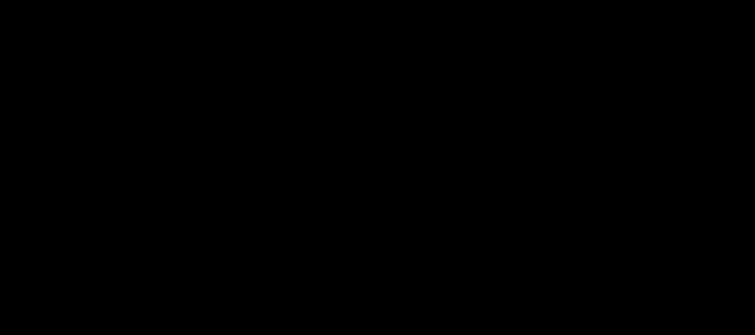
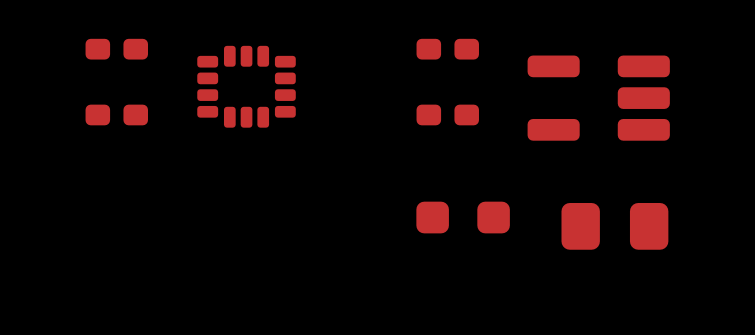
part: none -> (116, 49)
part: none -> (447, 49)
part: none -> (246, 86)
part: none -> (598, 98)
part: none -> (116, 114)
part: none -> (447, 114)
part: none -> (463, 217)
part: none -> (614, 226)

